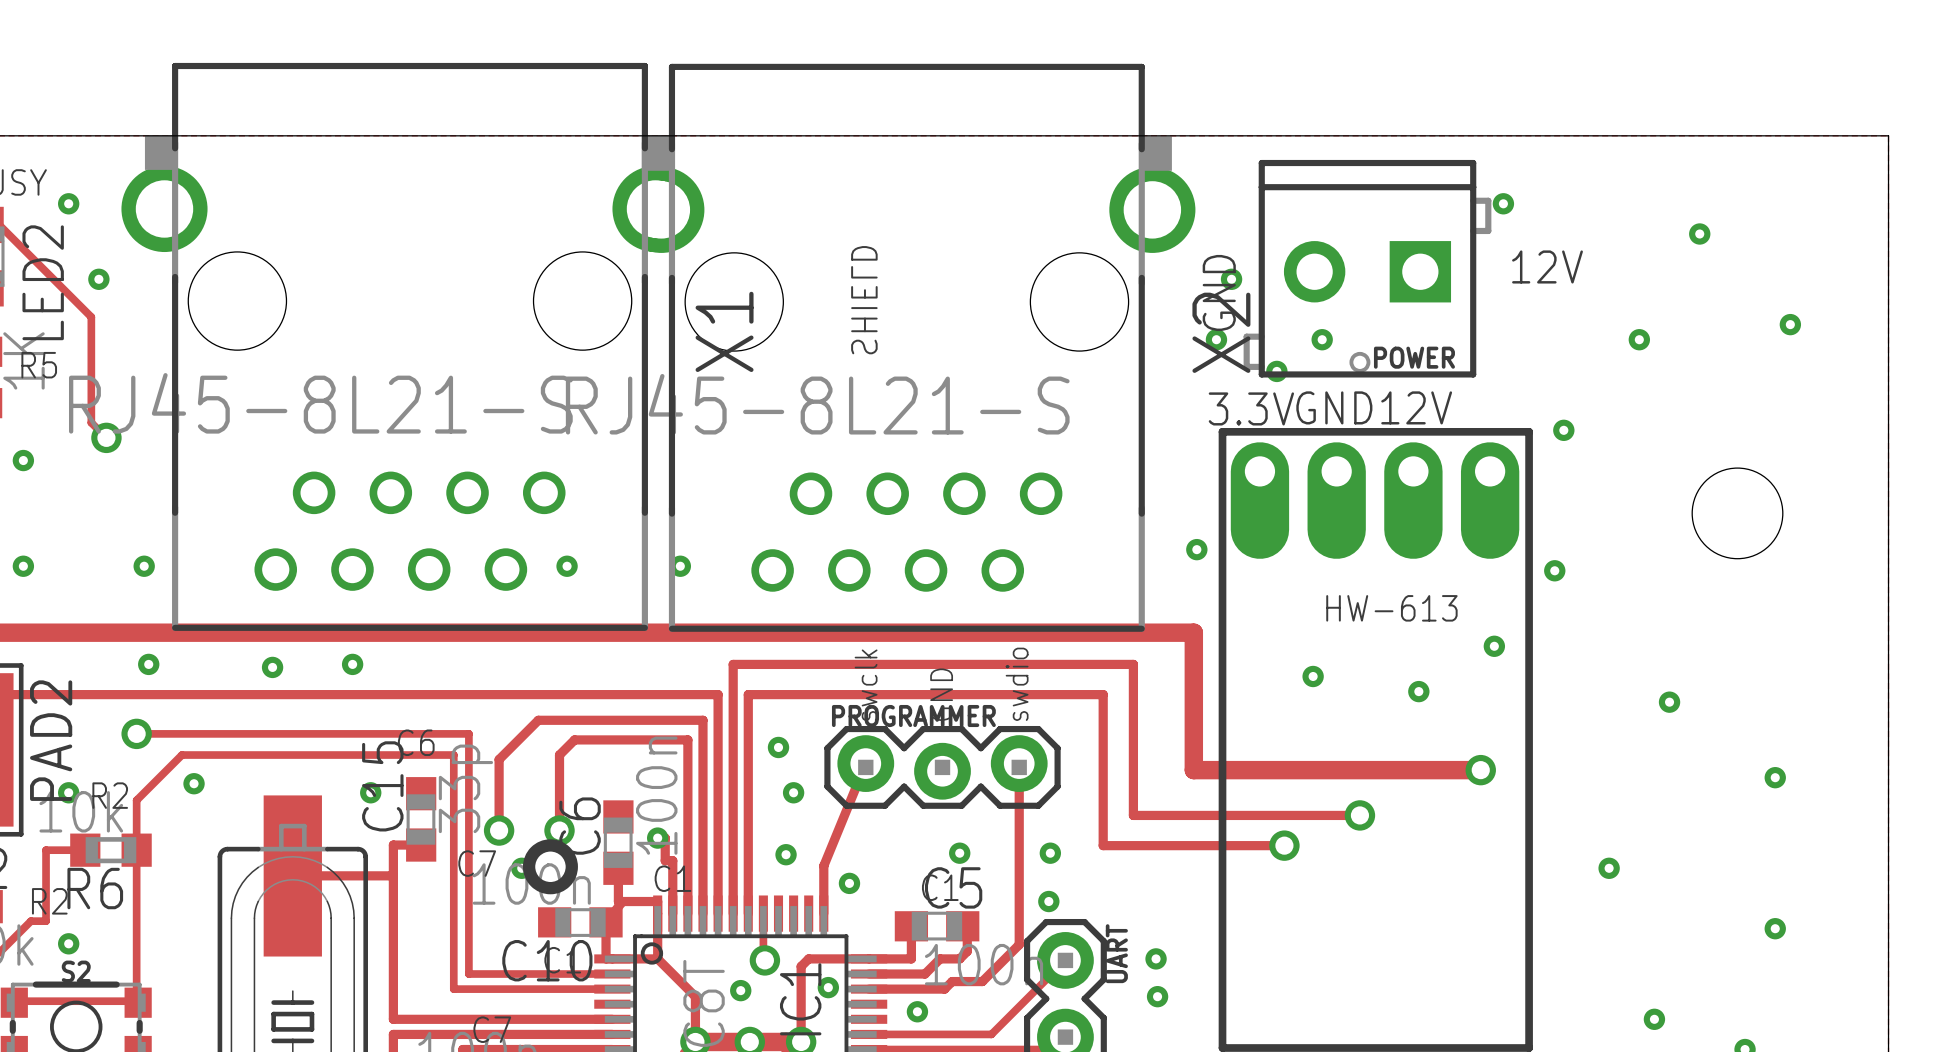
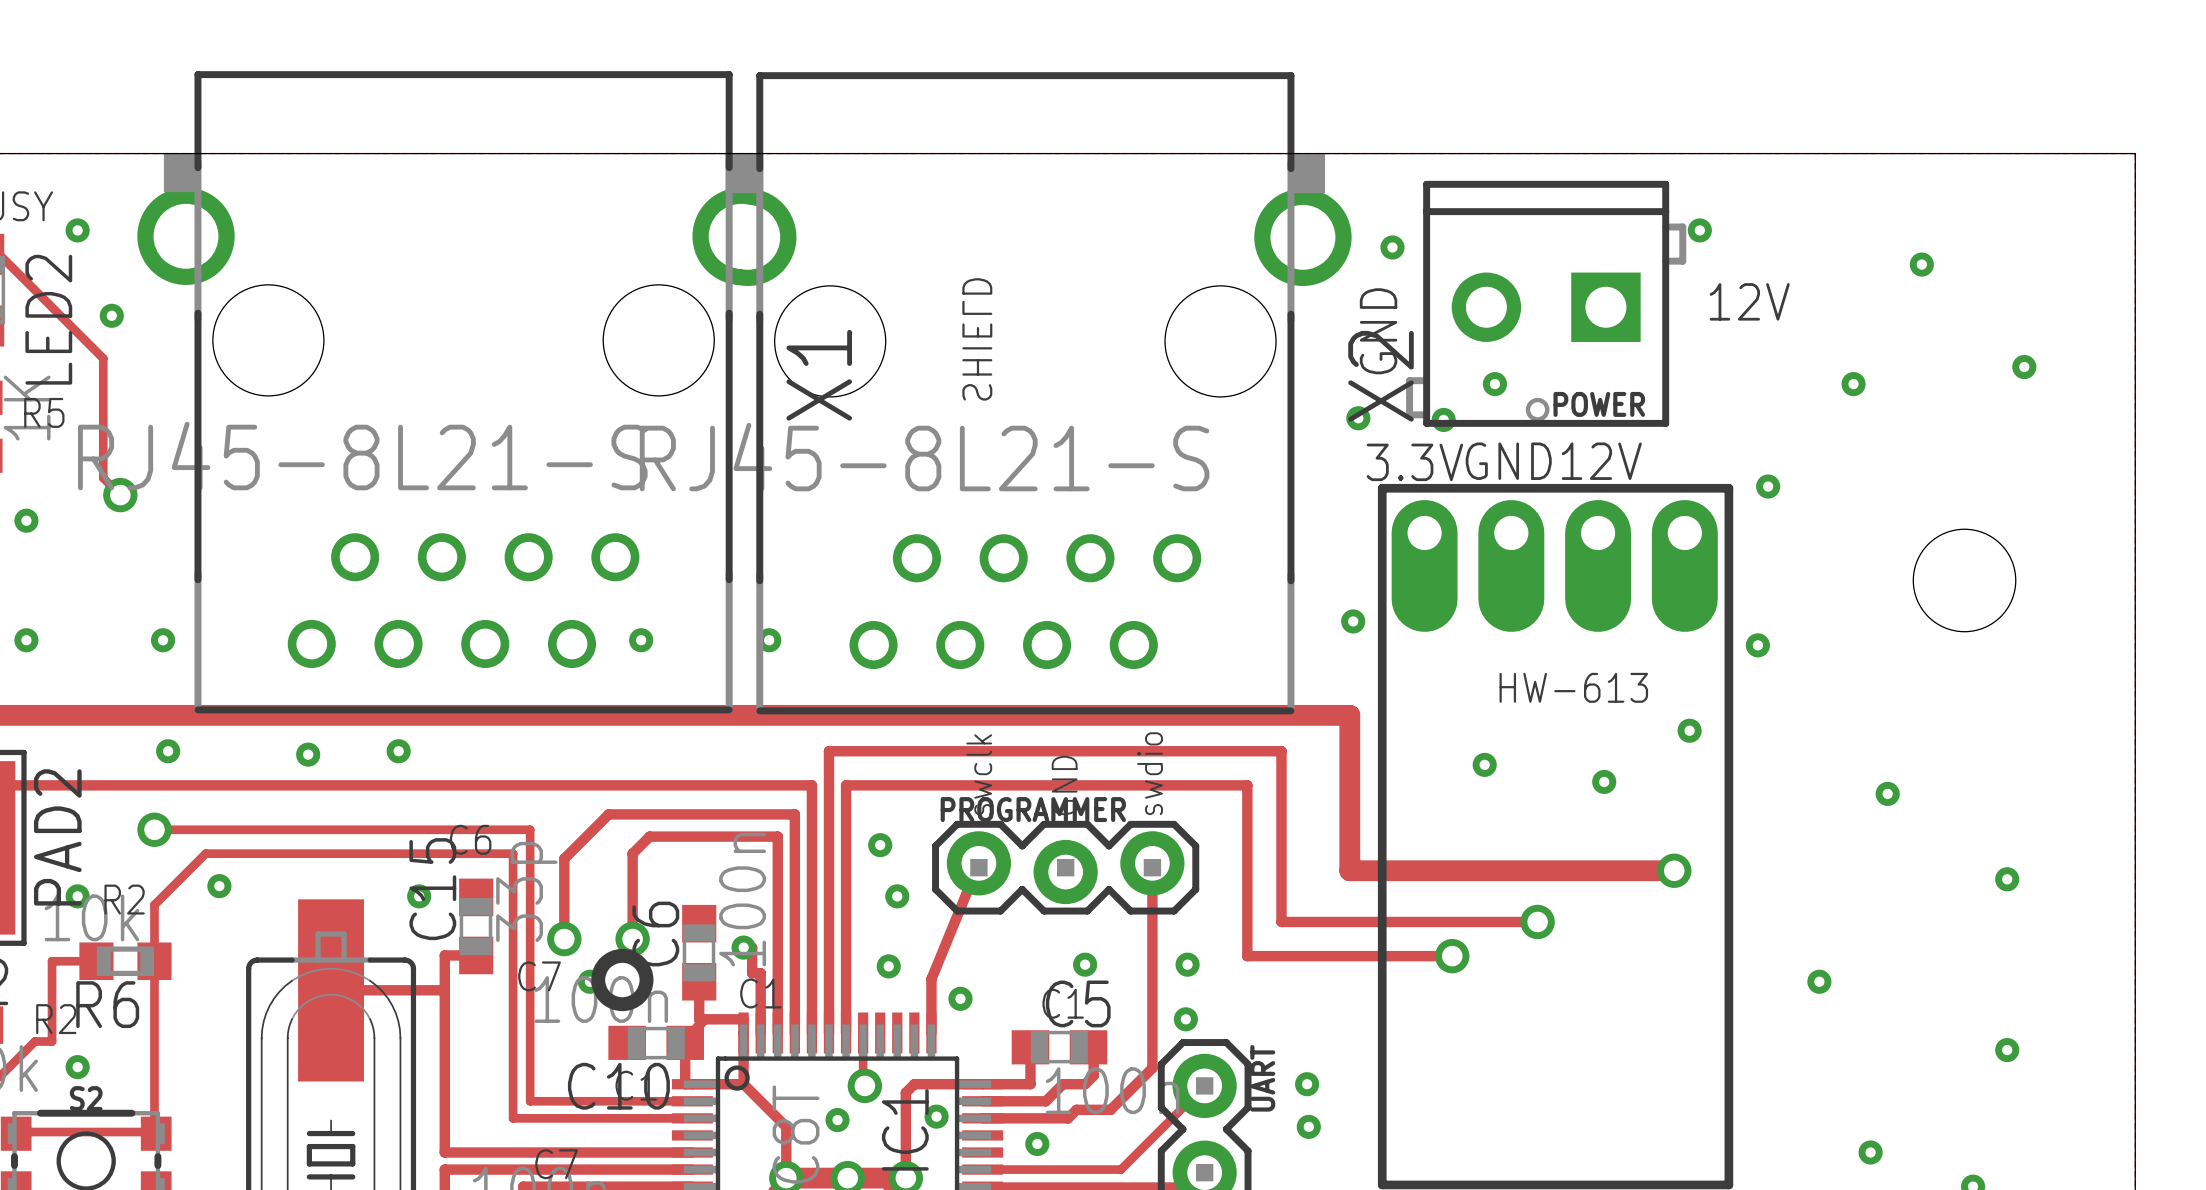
via: none -> (1392, 247)
via: (1231, 279) -> none
via position: (1216, 339) -> (1358, 418)

